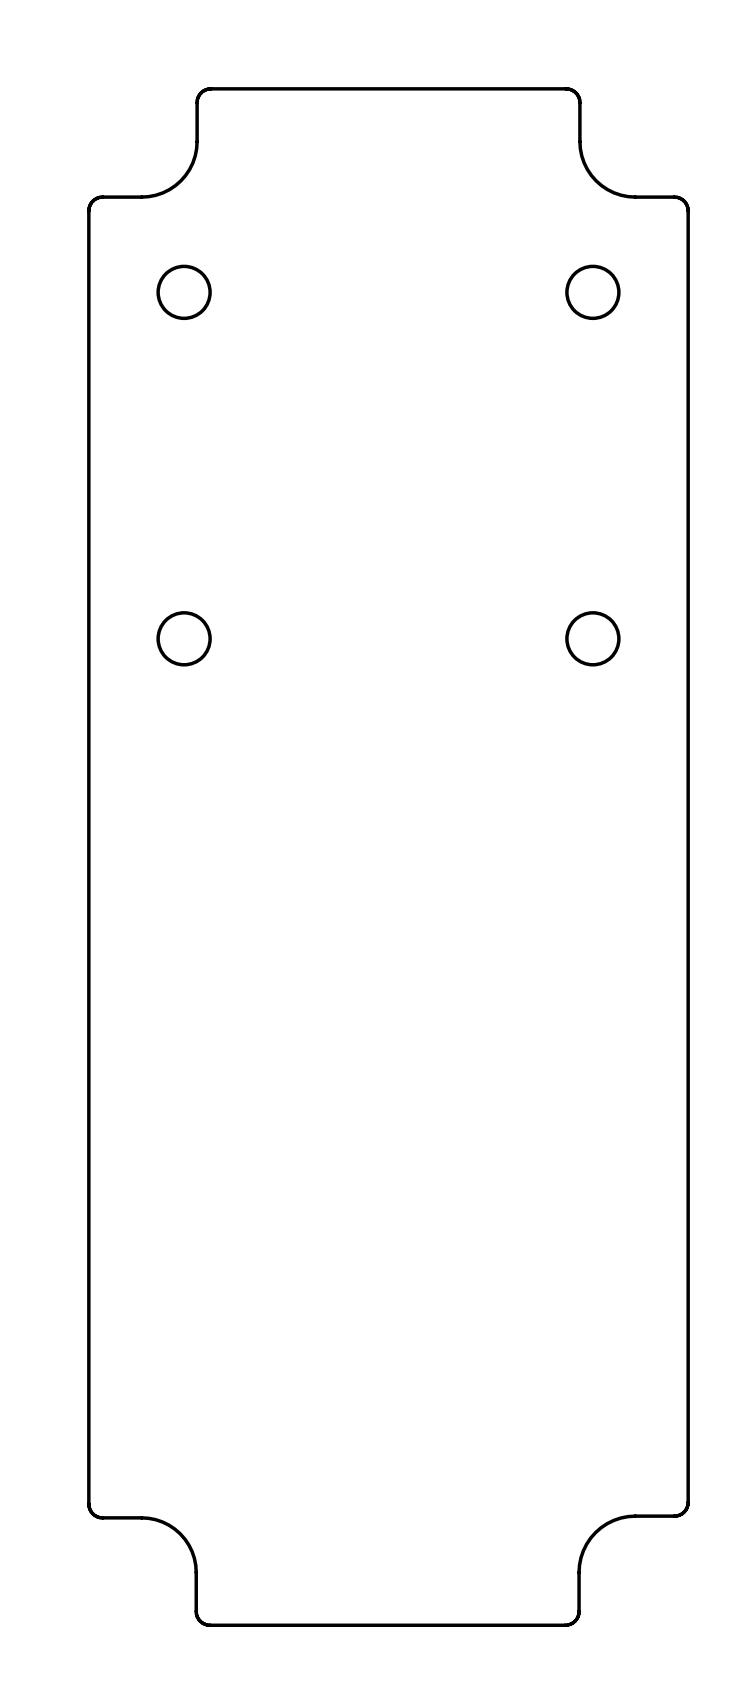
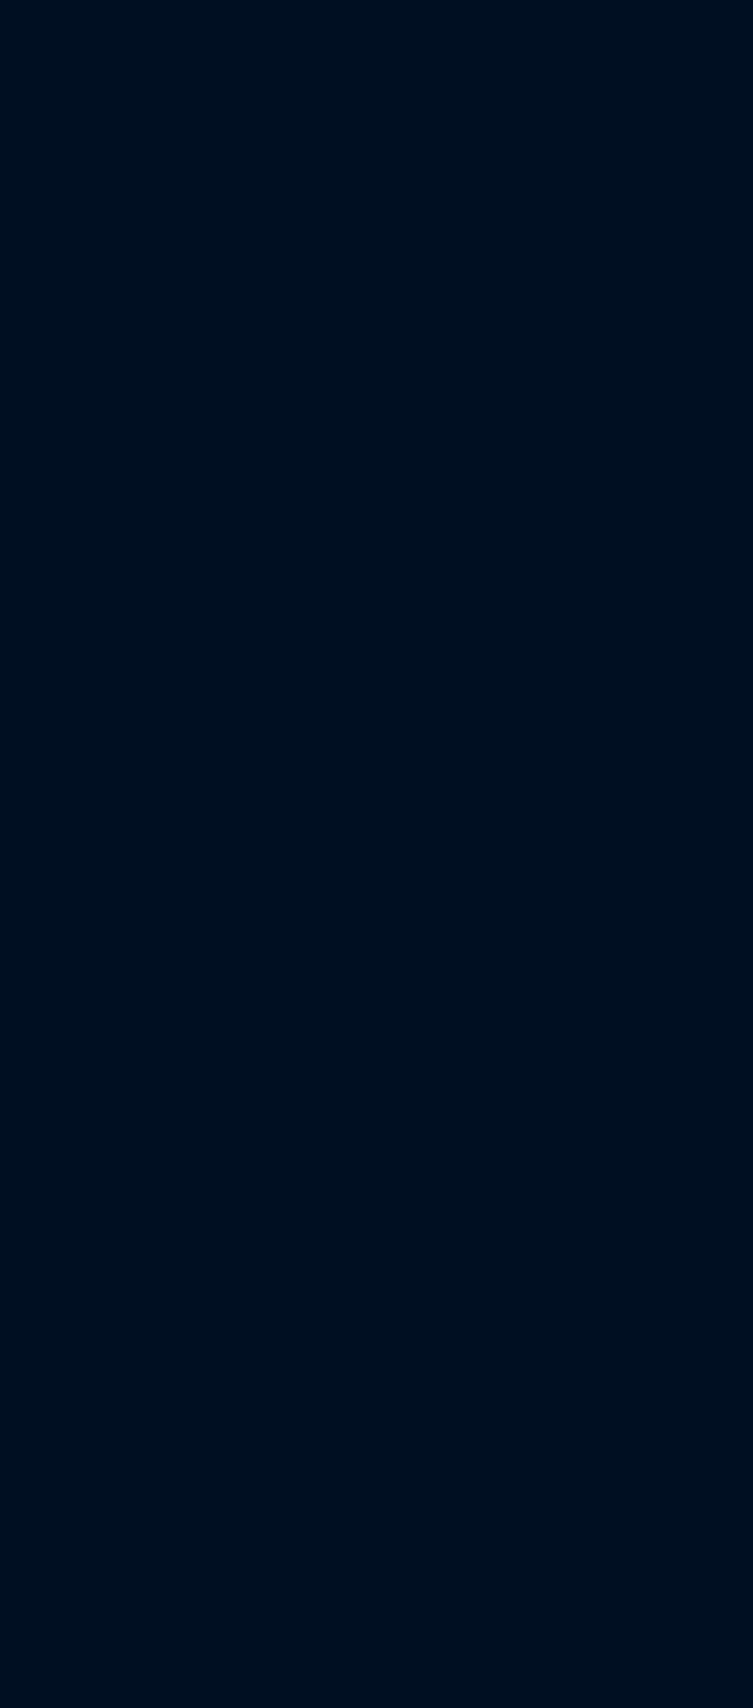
board edge: (210, 88) (569, 89) (575, 92) (579, 98) (581, 156) (587, 169) (596, 180) (607, 189) (620, 195) (678, 197) (684, 201) (687, 207) (688, 1503) (685, 1510) (678, 1515) (620, 1518) (607, 1523) (595, 1532) (586, 1544) (580, 1557) (578, 1615) (574, 1621) (568, 1624) (206, 1624) (200, 1621) (196, 1615) (194, 1558) (188, 1545) (180, 1533) (168, 1525) (155, 1519) (98, 1517) (92, 1513) (89, 1507) (88, 209) (91, 202) (98, 197) (156, 195) (169, 189) (180, 180) (189, 169) (195, 156) (197, 98) (202, 91) (210, 88) -> none
round board edge: [156, 264, 212, 321] -> none
round board edge: [565, 264, 621, 321] -> none
round board edge: [156, 611, 212, 667] -> none
round board edge: [565, 611, 621, 667] -> none

